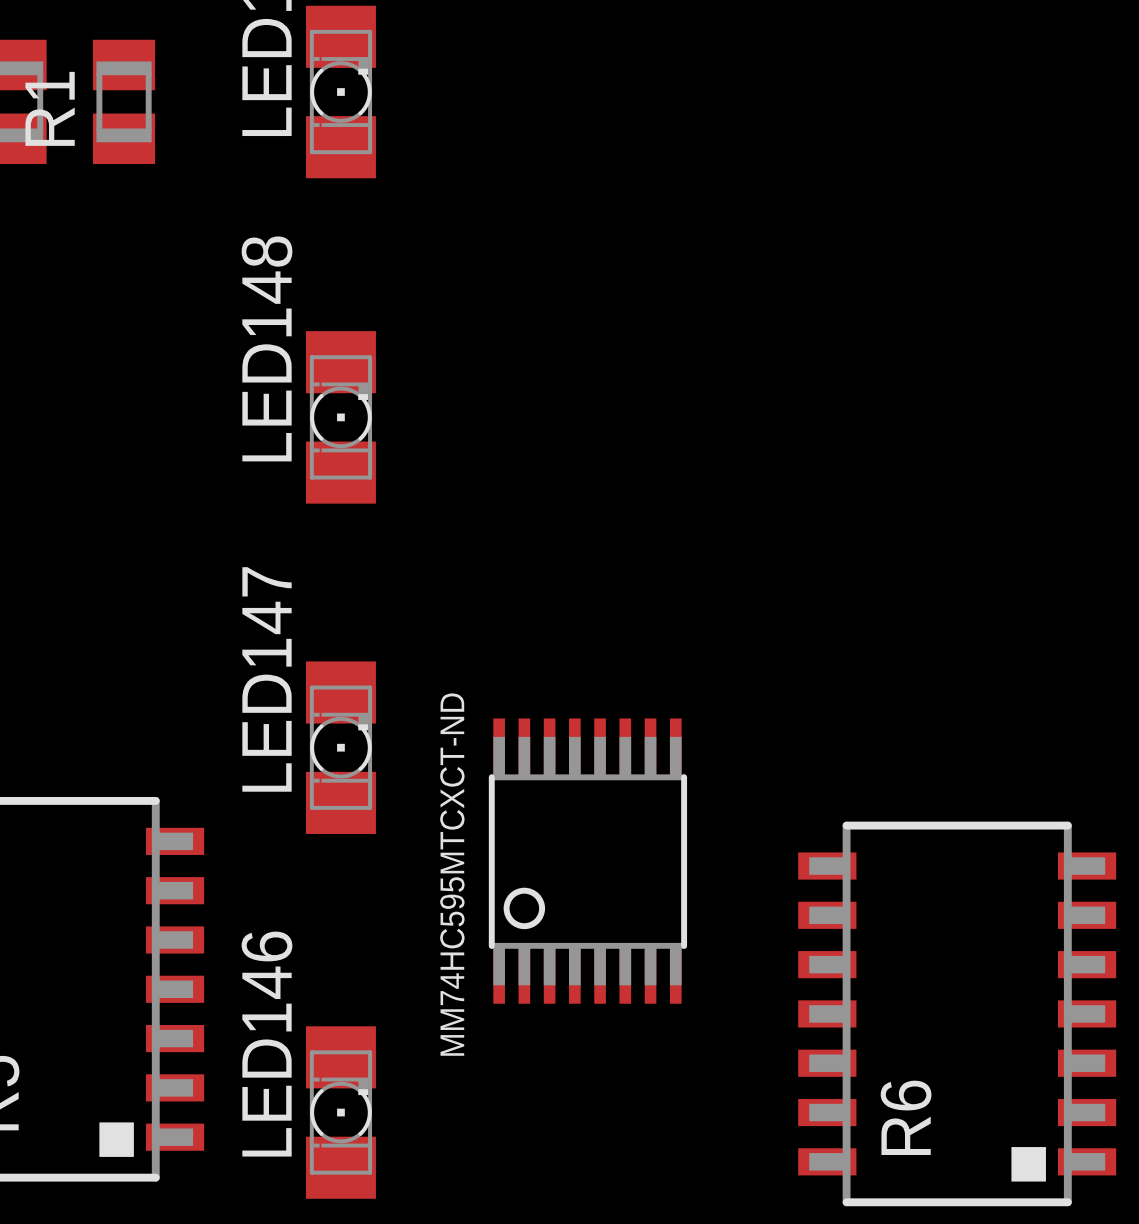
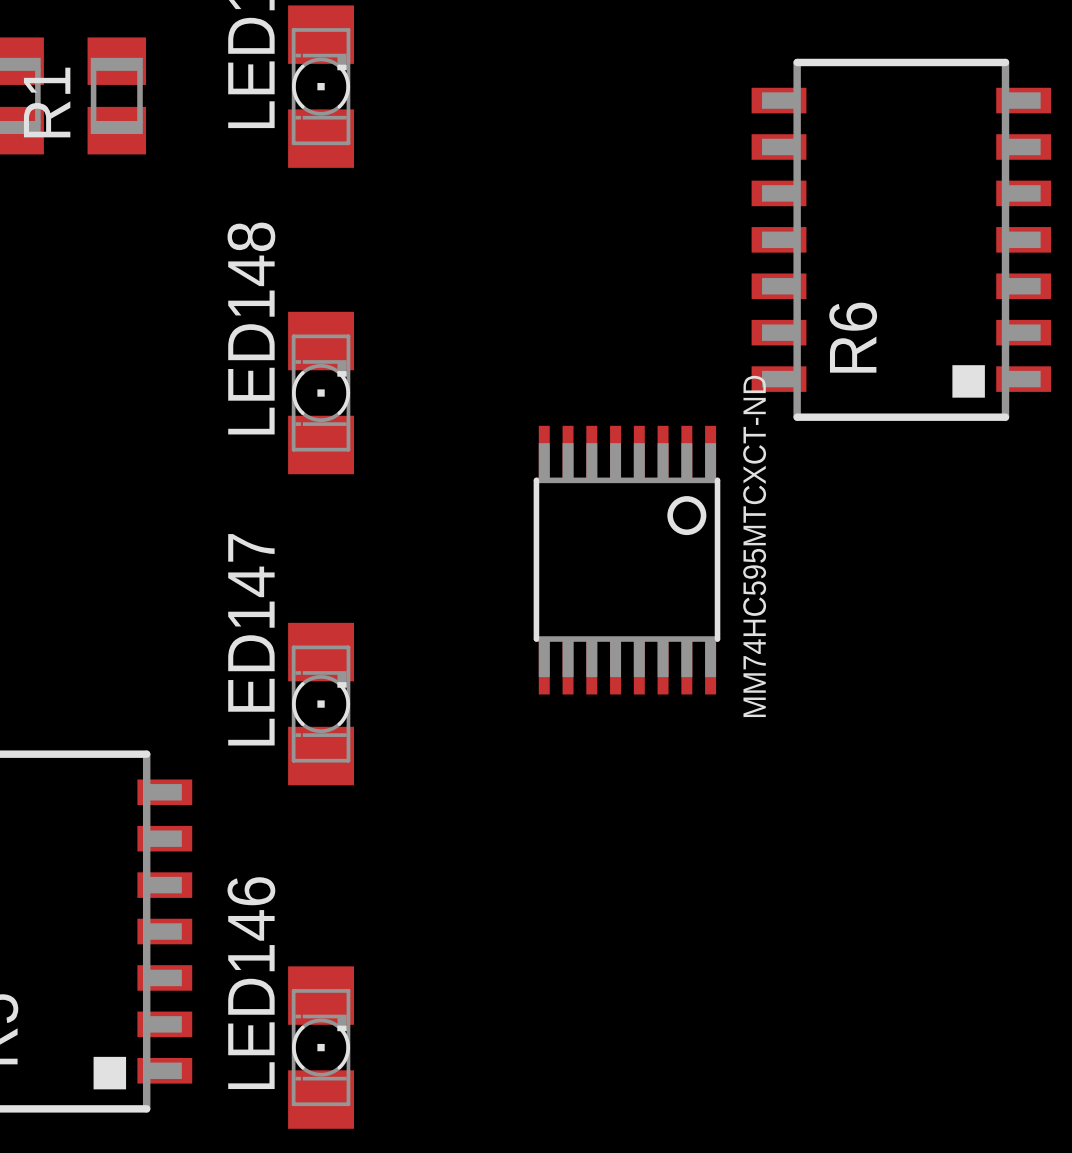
part: none -> (626, 560)
part: (587, 861) -> none
R6 position: (957, 1013) -> (901, 239)

